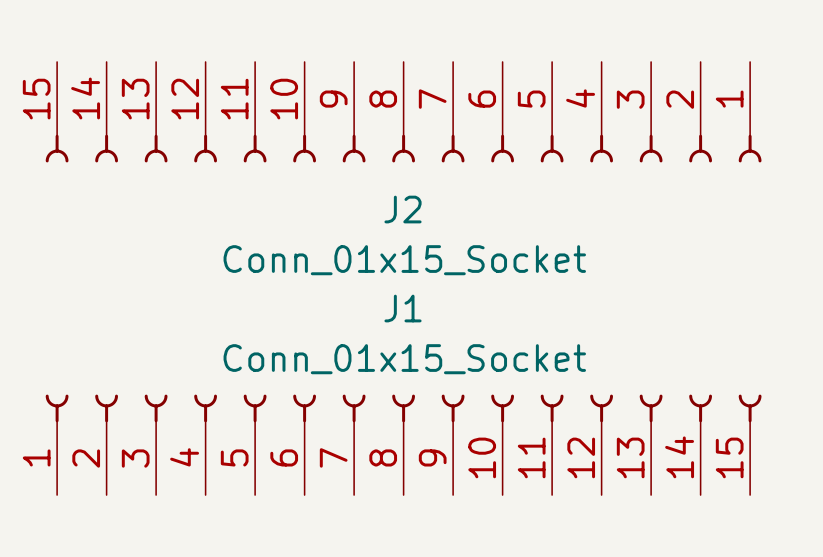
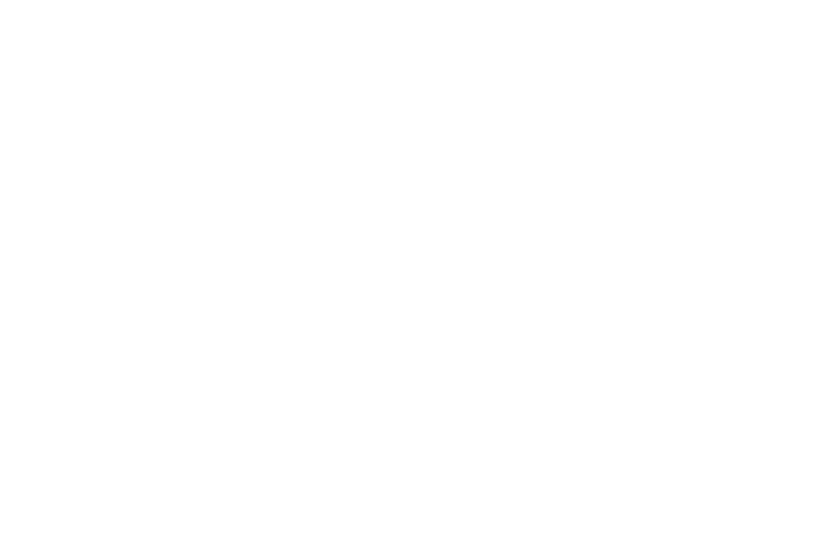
J2: Conn_01x15_Socket (403, 112) -> none
J1: Conn_01x15_Socket (403, 444) -> none

